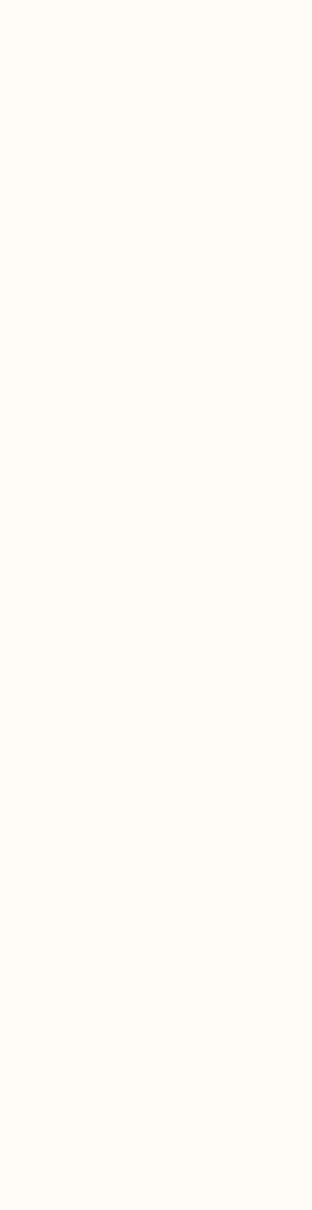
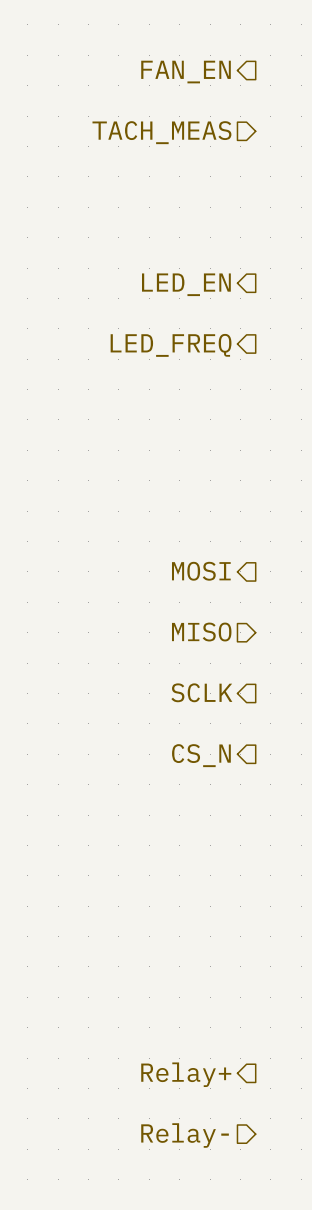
hierarchical label: none -> FAN_EN (186, 72)
hierarchical label: none -> TACH_MEAS (161, 132)
hierarchical label: none -> LED_EN (186, 284)
hierarchical label: none -> LED_FREQ (171, 345)
hierarchical label: none -> MOSI (201, 571)
hierarchical label: none -> MISO (201, 632)
hierarchical label: none -> SCLK (201, 692)
hierarchical label: none -> CS_N (201, 755)
hierarchical label: none -> Relay+ (186, 1074)
hierarchical label: none -> Relay- (185, 1135)

